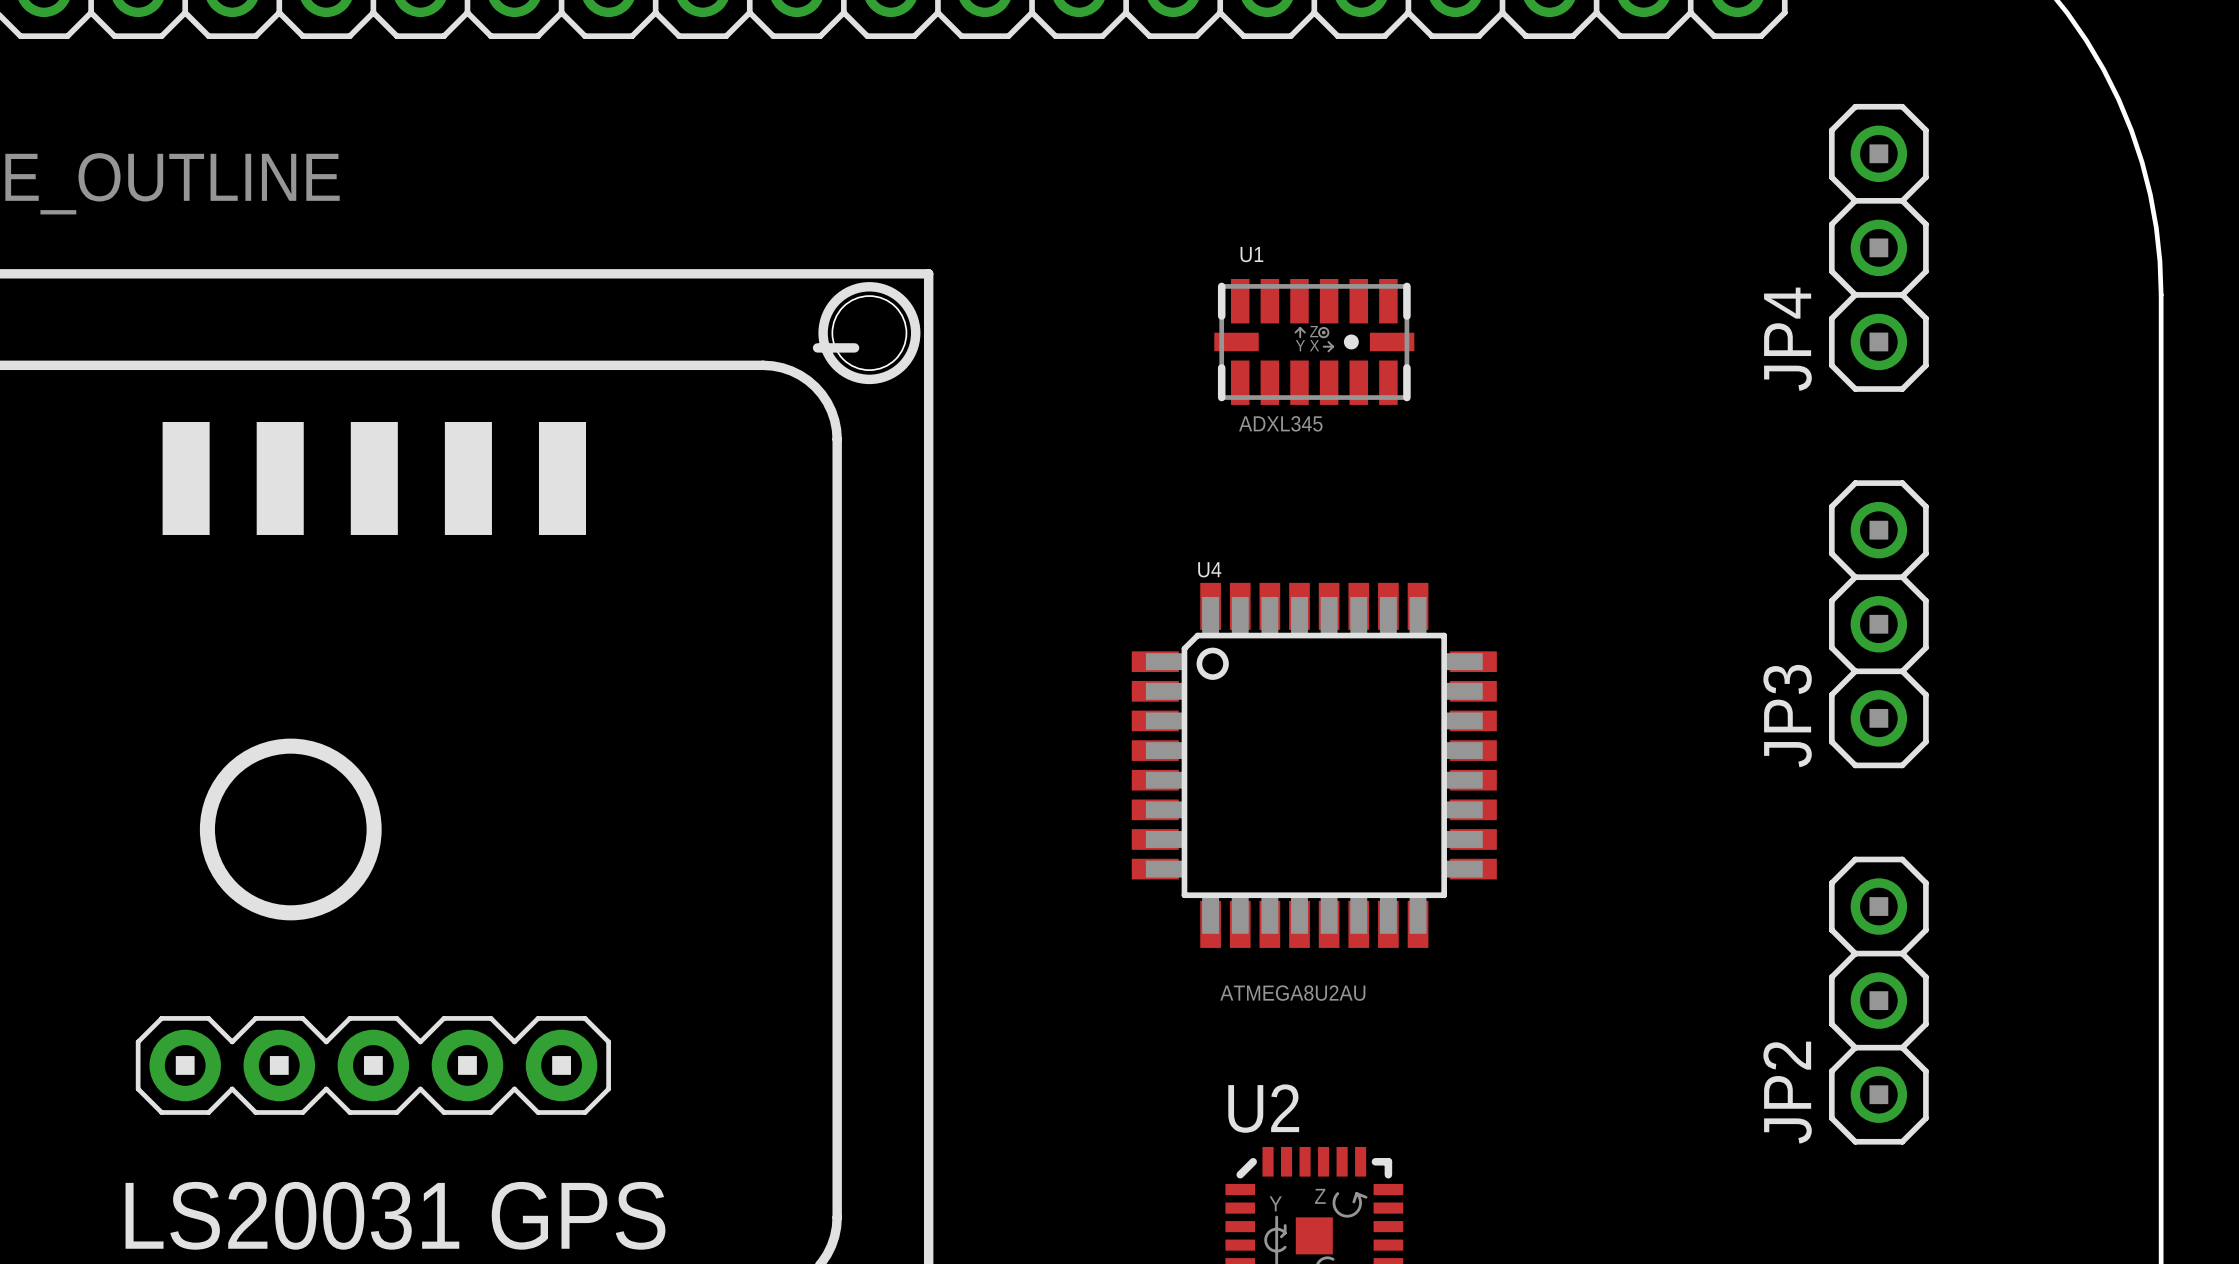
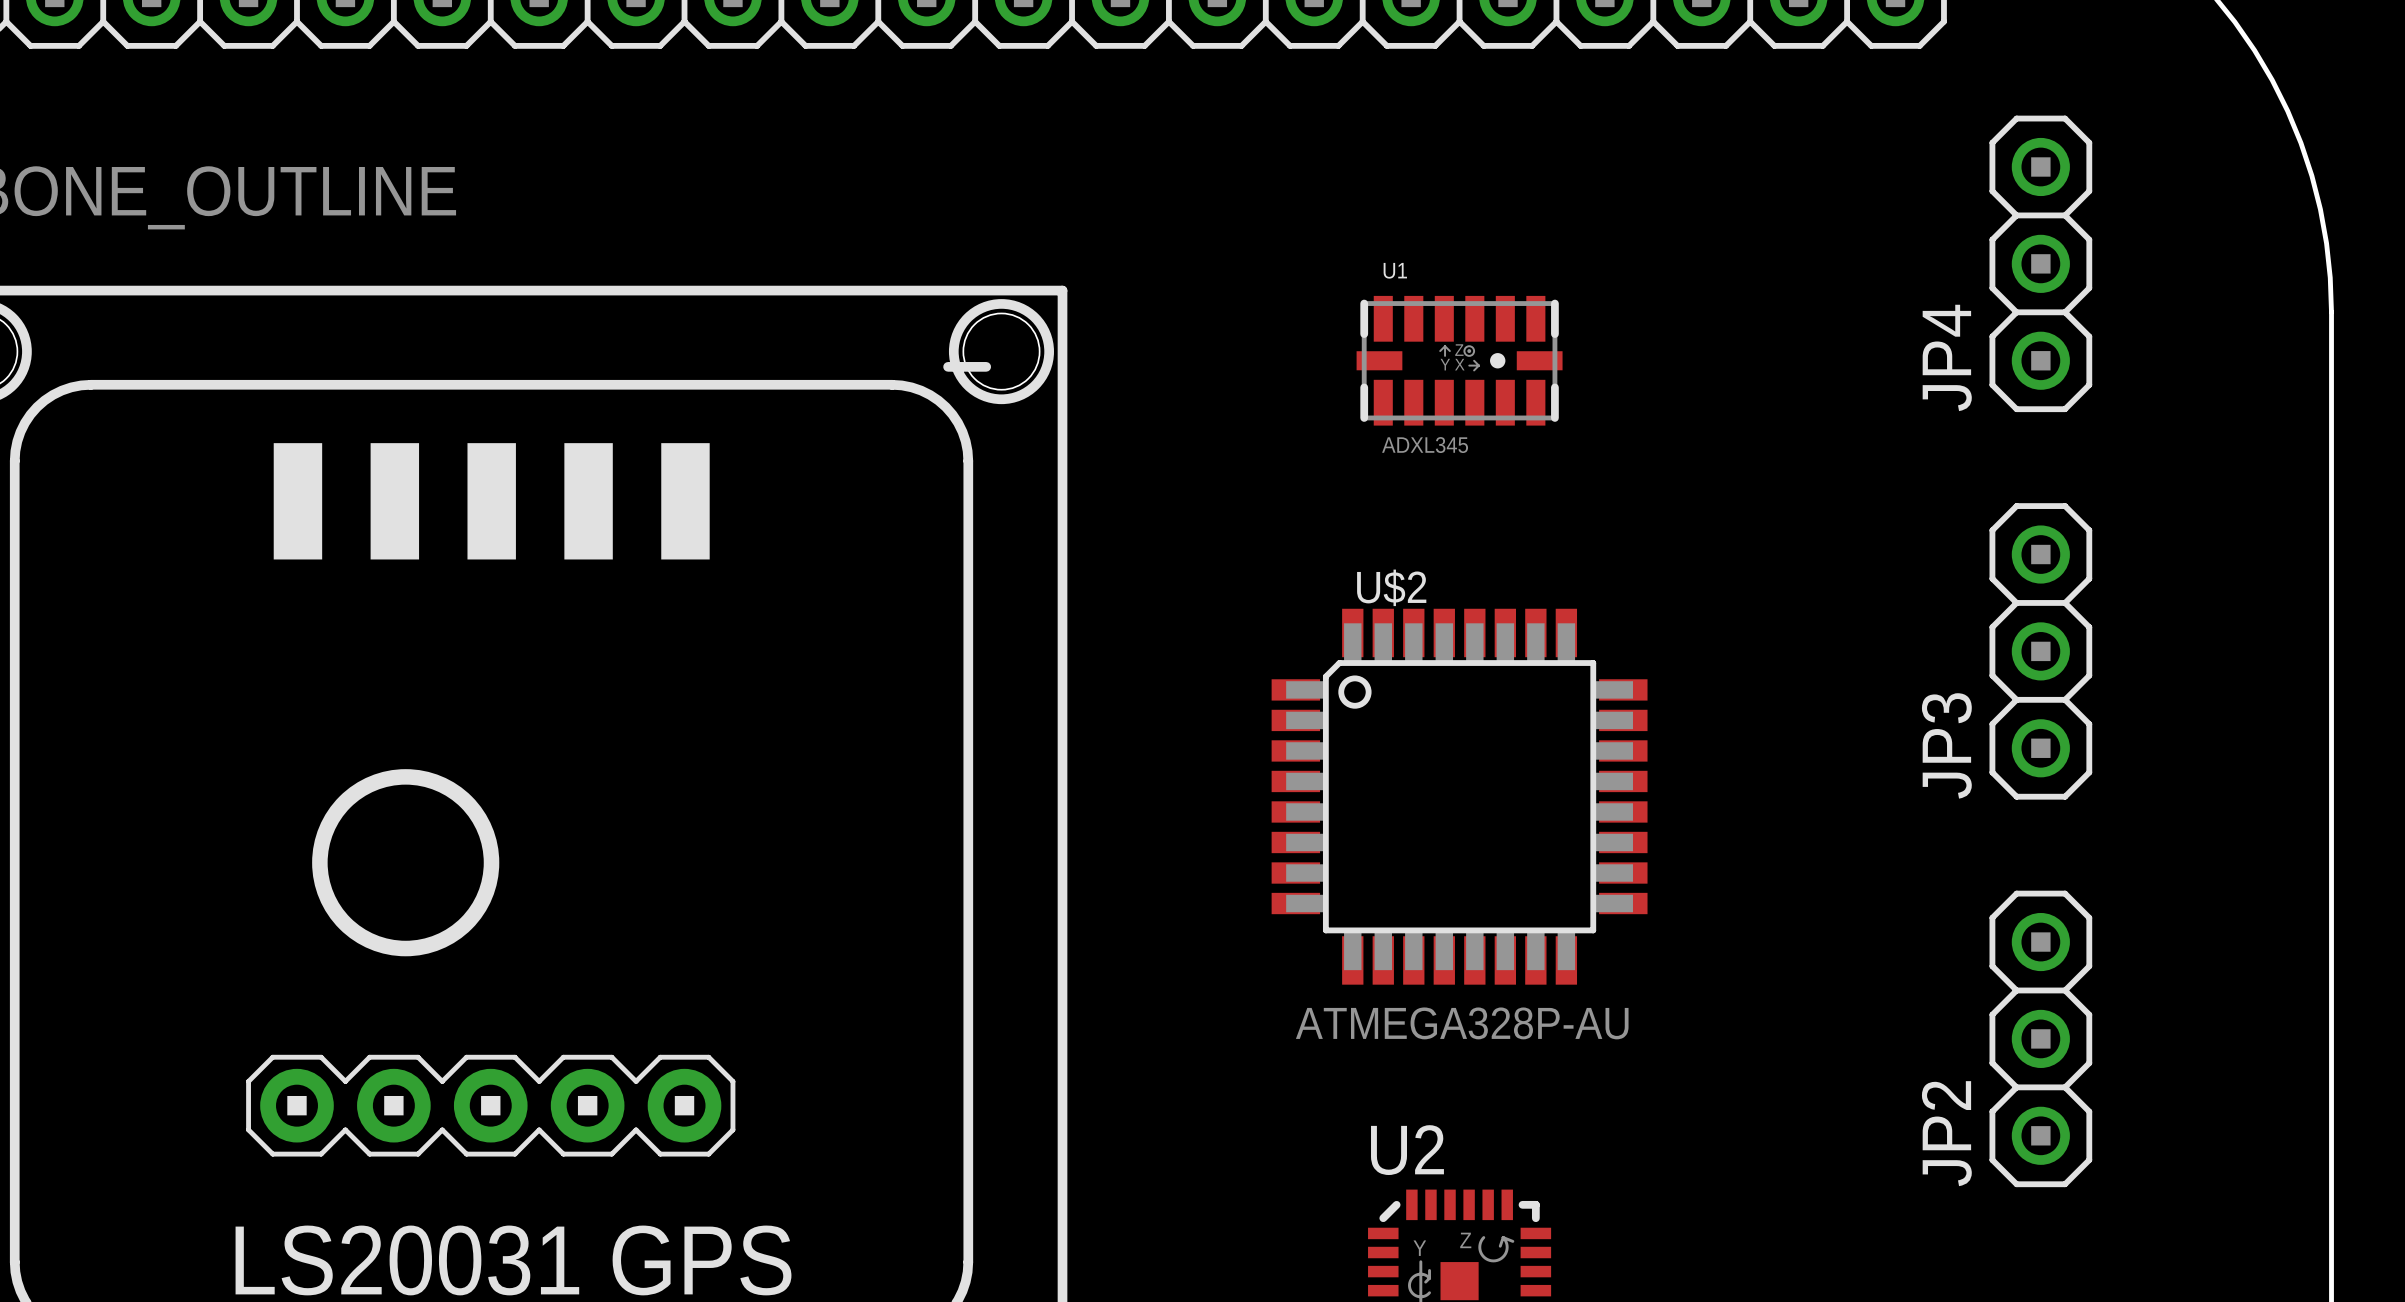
U4 name: U4 (1209, 569) -> U$2 (1391, 587)
U4 value: ATMEGA8U2AU (1292, 993) -> ATMEGA328P-AU (1462, 1023)

